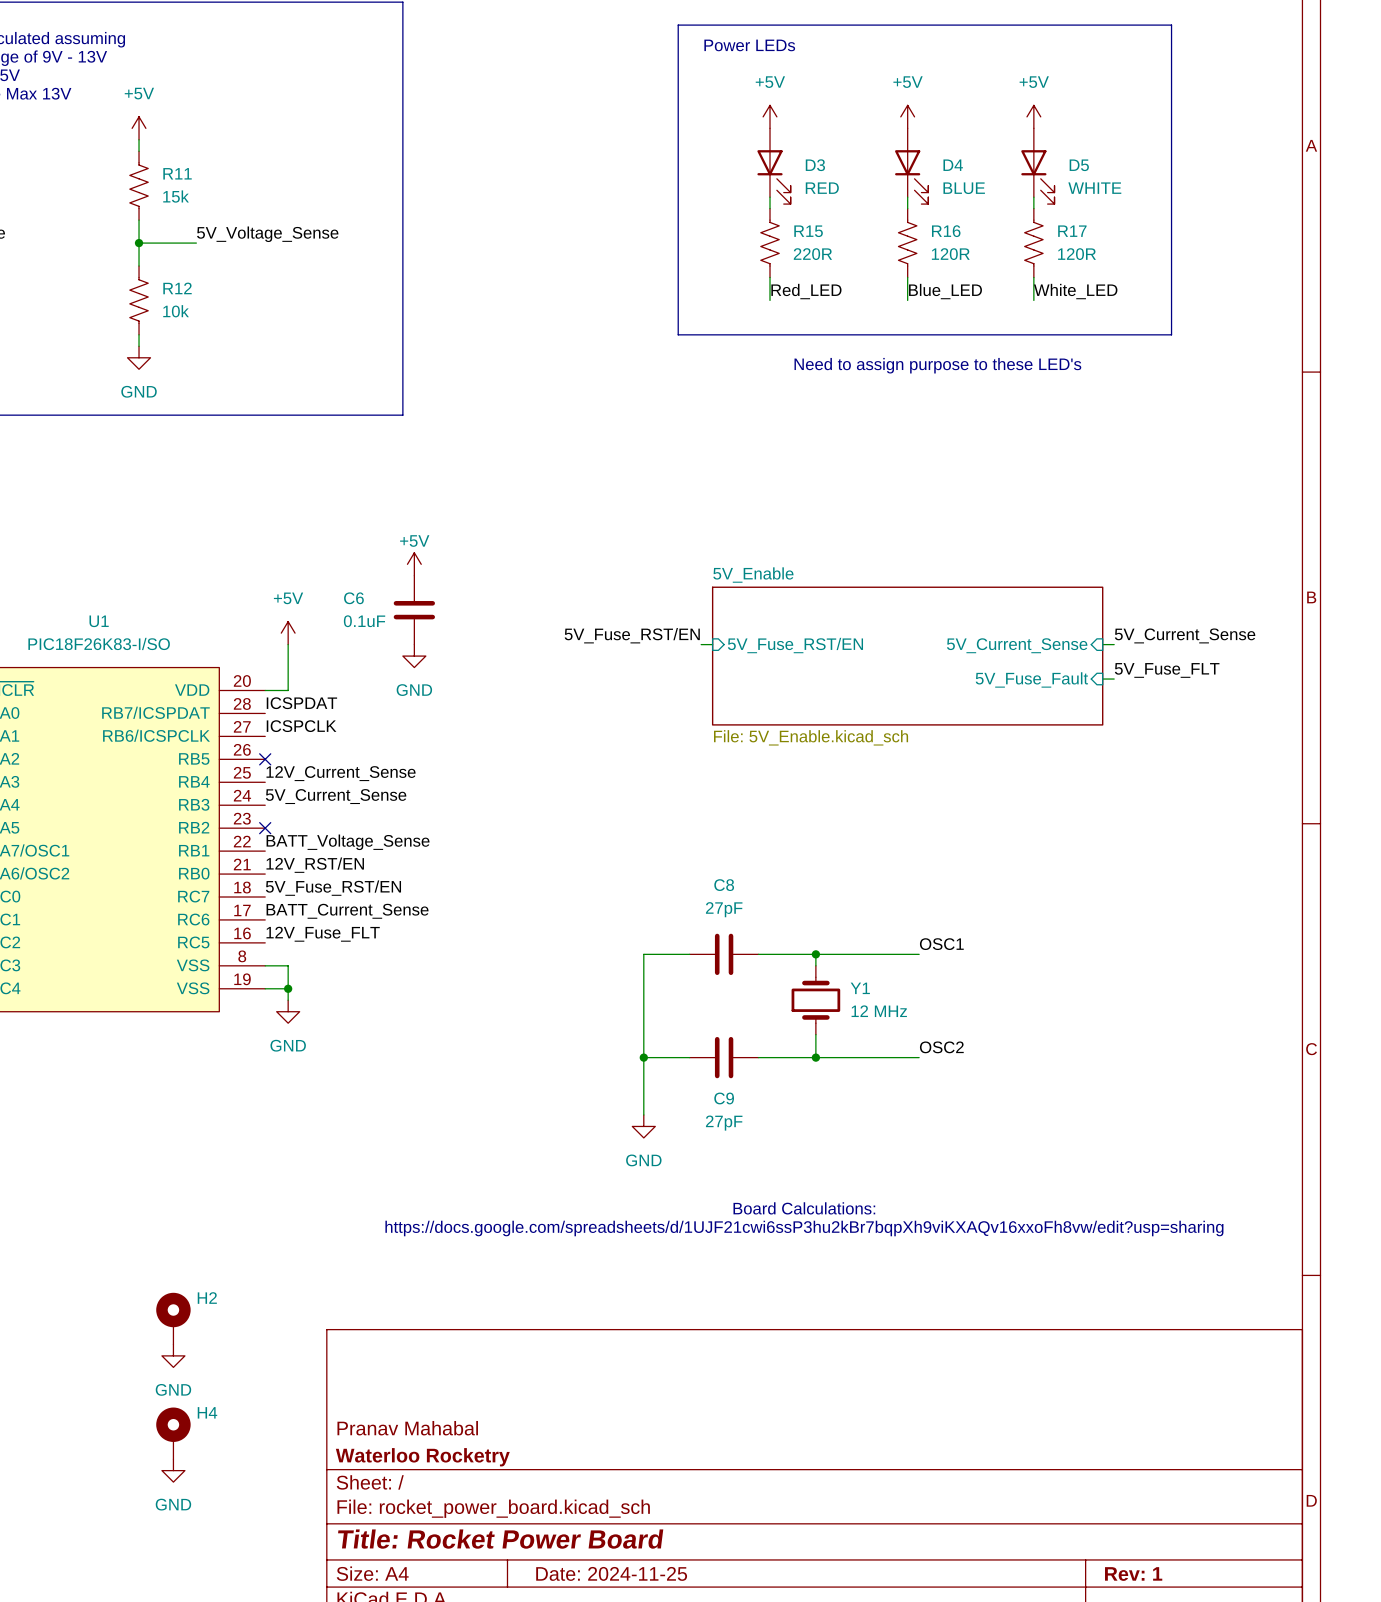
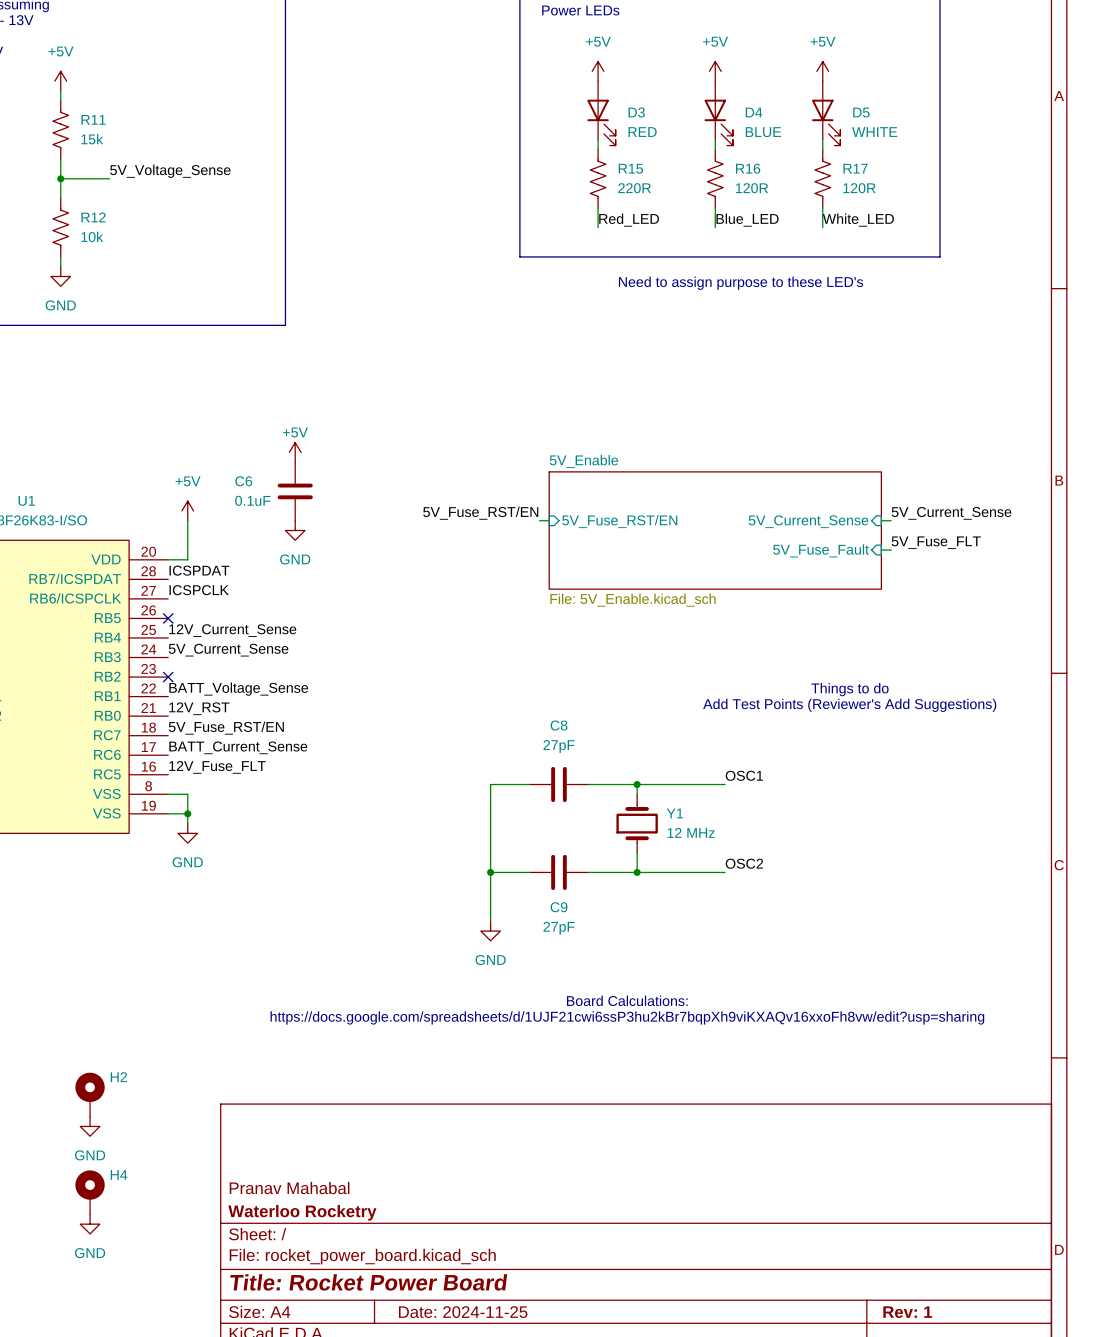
text: none -> Things to do (849, 689)
text: none -> Add Test Points (Reviewer's Add Suggestions) (849, 705)
label: 12V_RST/EN (315, 865) -> 12V_RST (199, 708)

